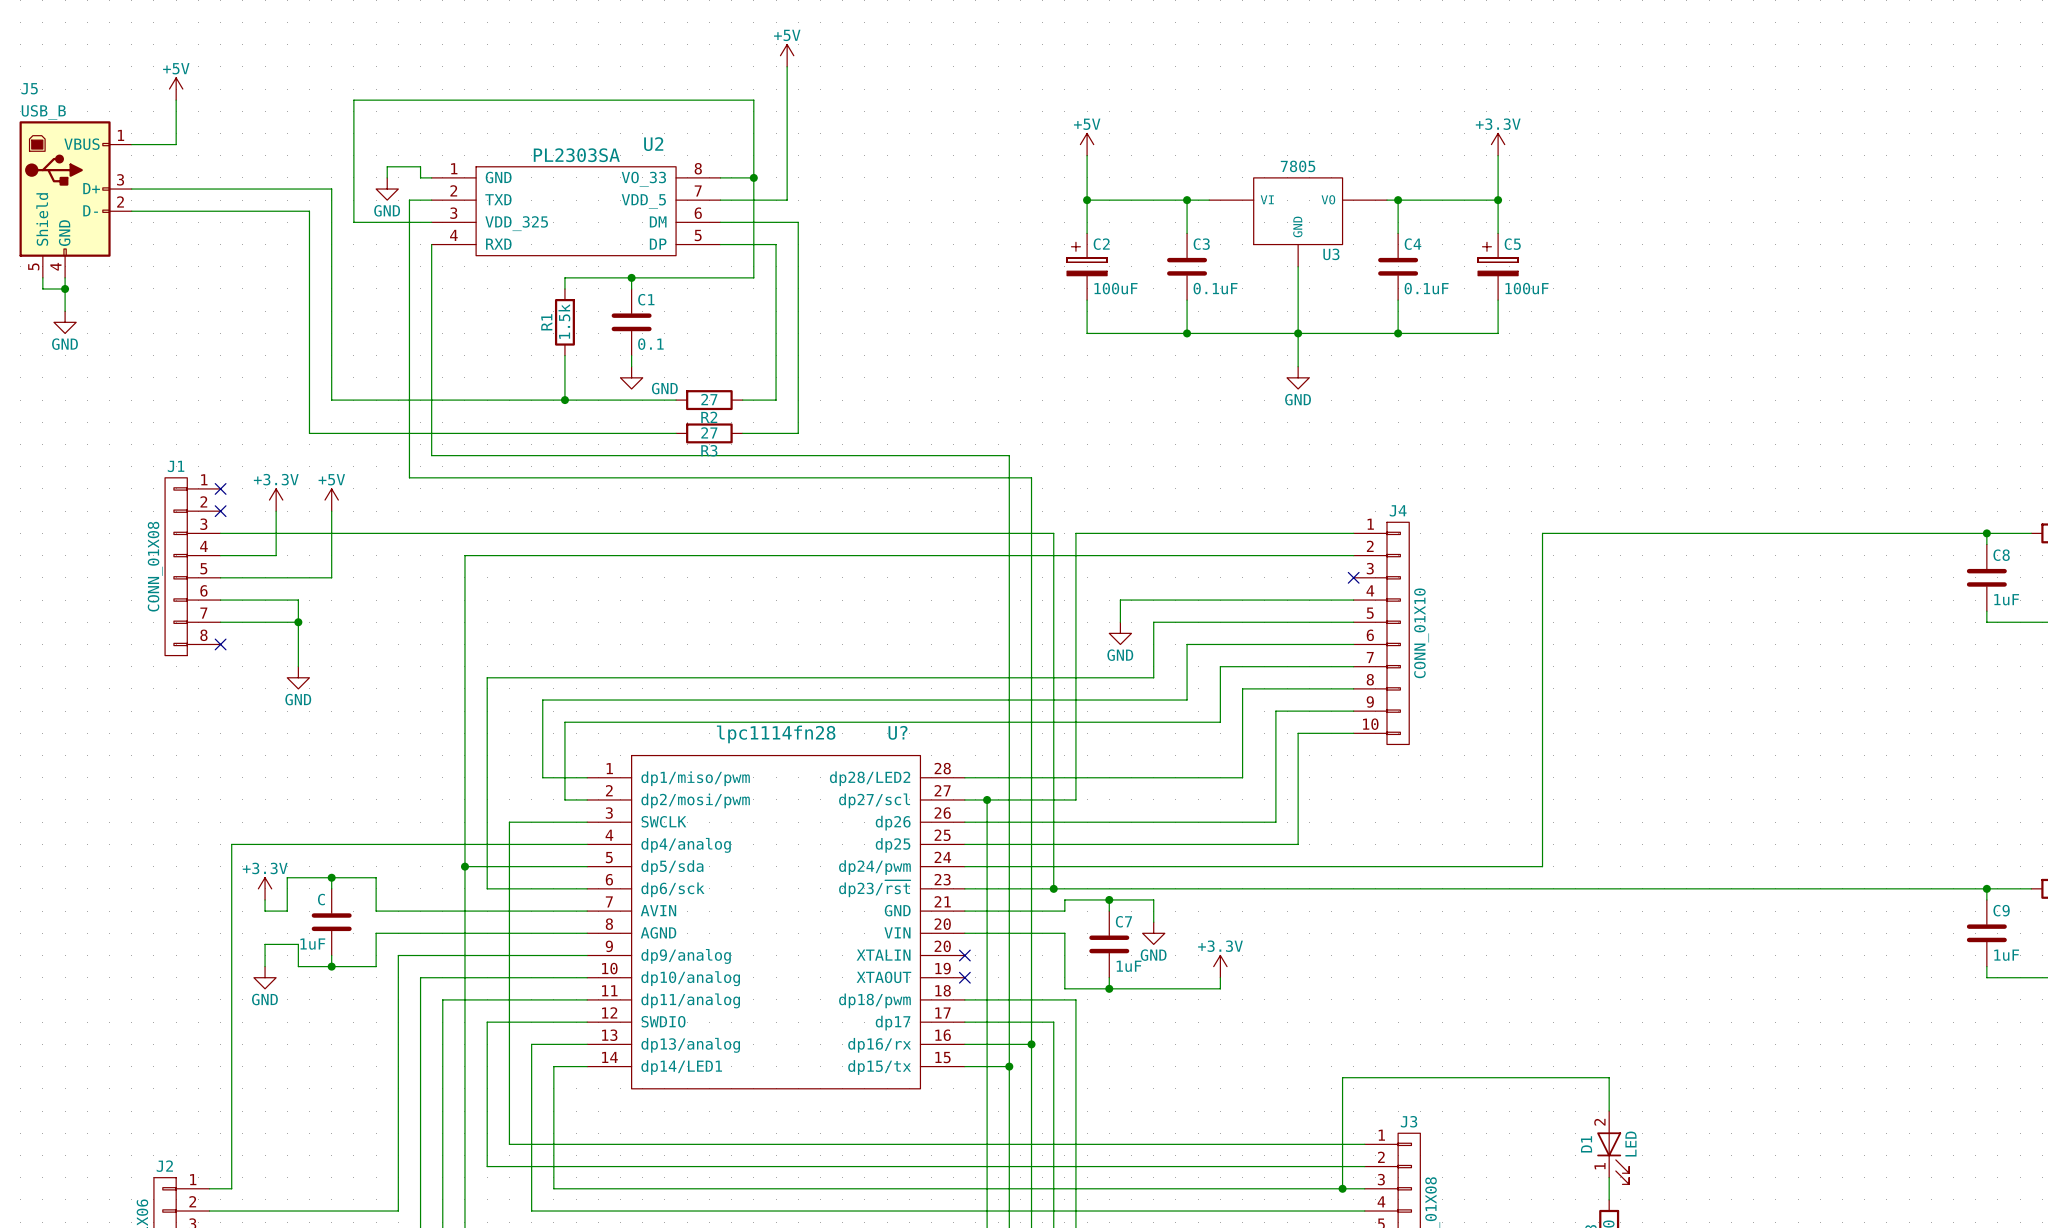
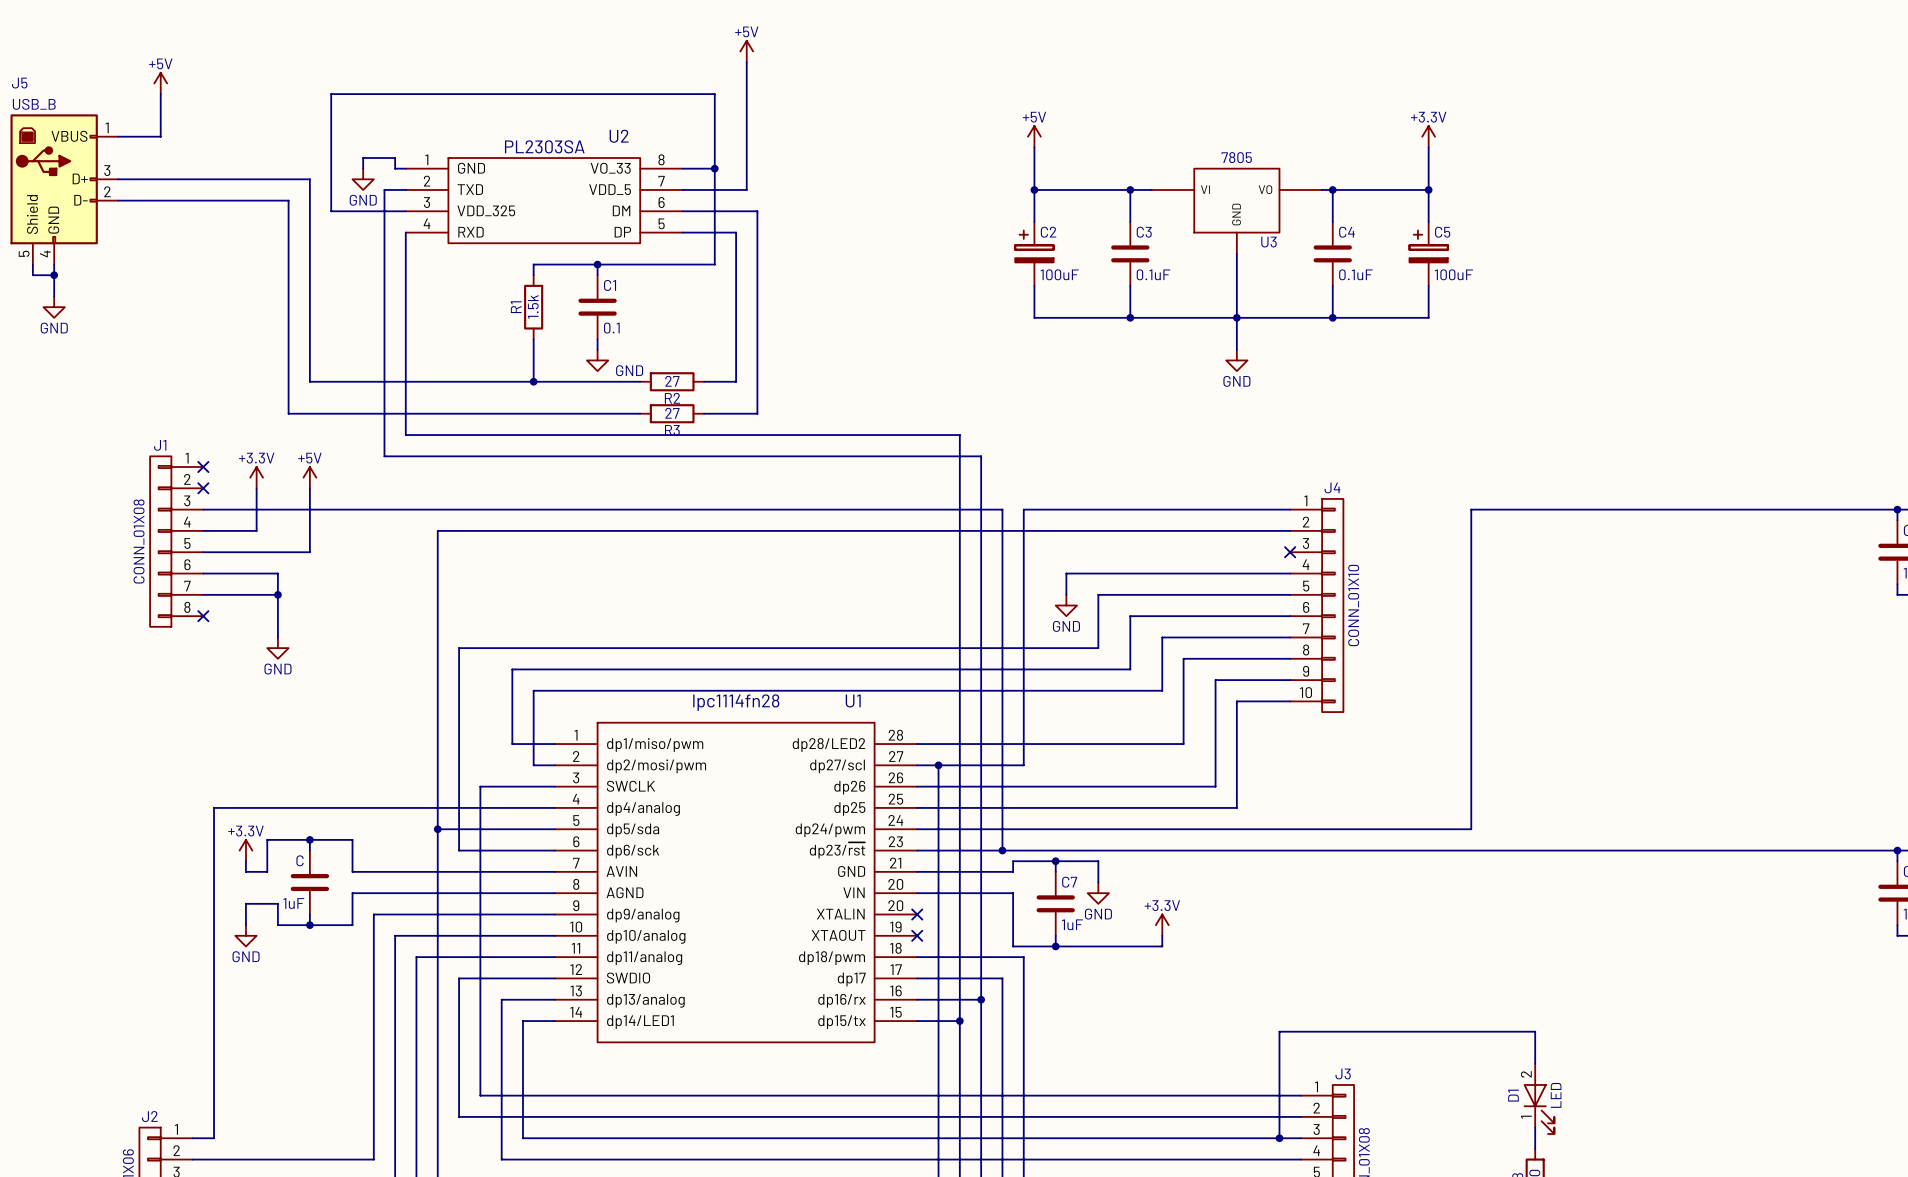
U? name: U? (898, 732) -> U1 (853, 701)

